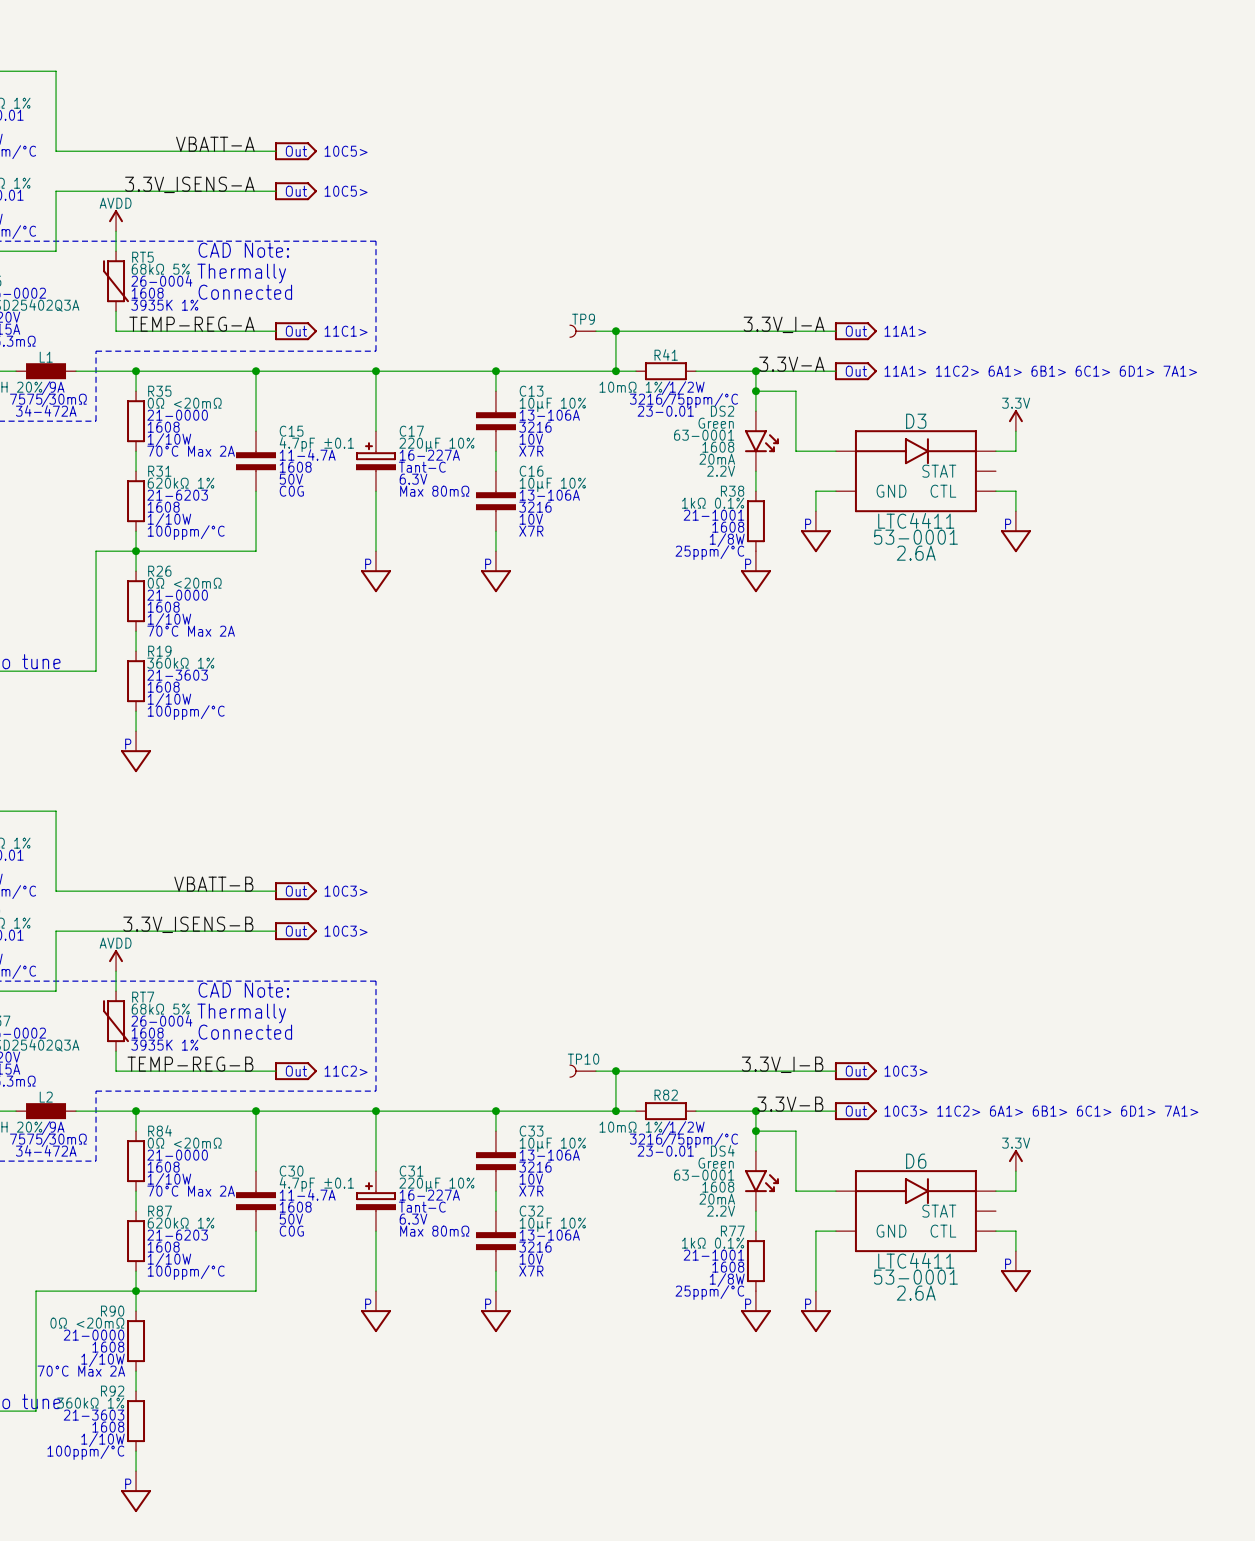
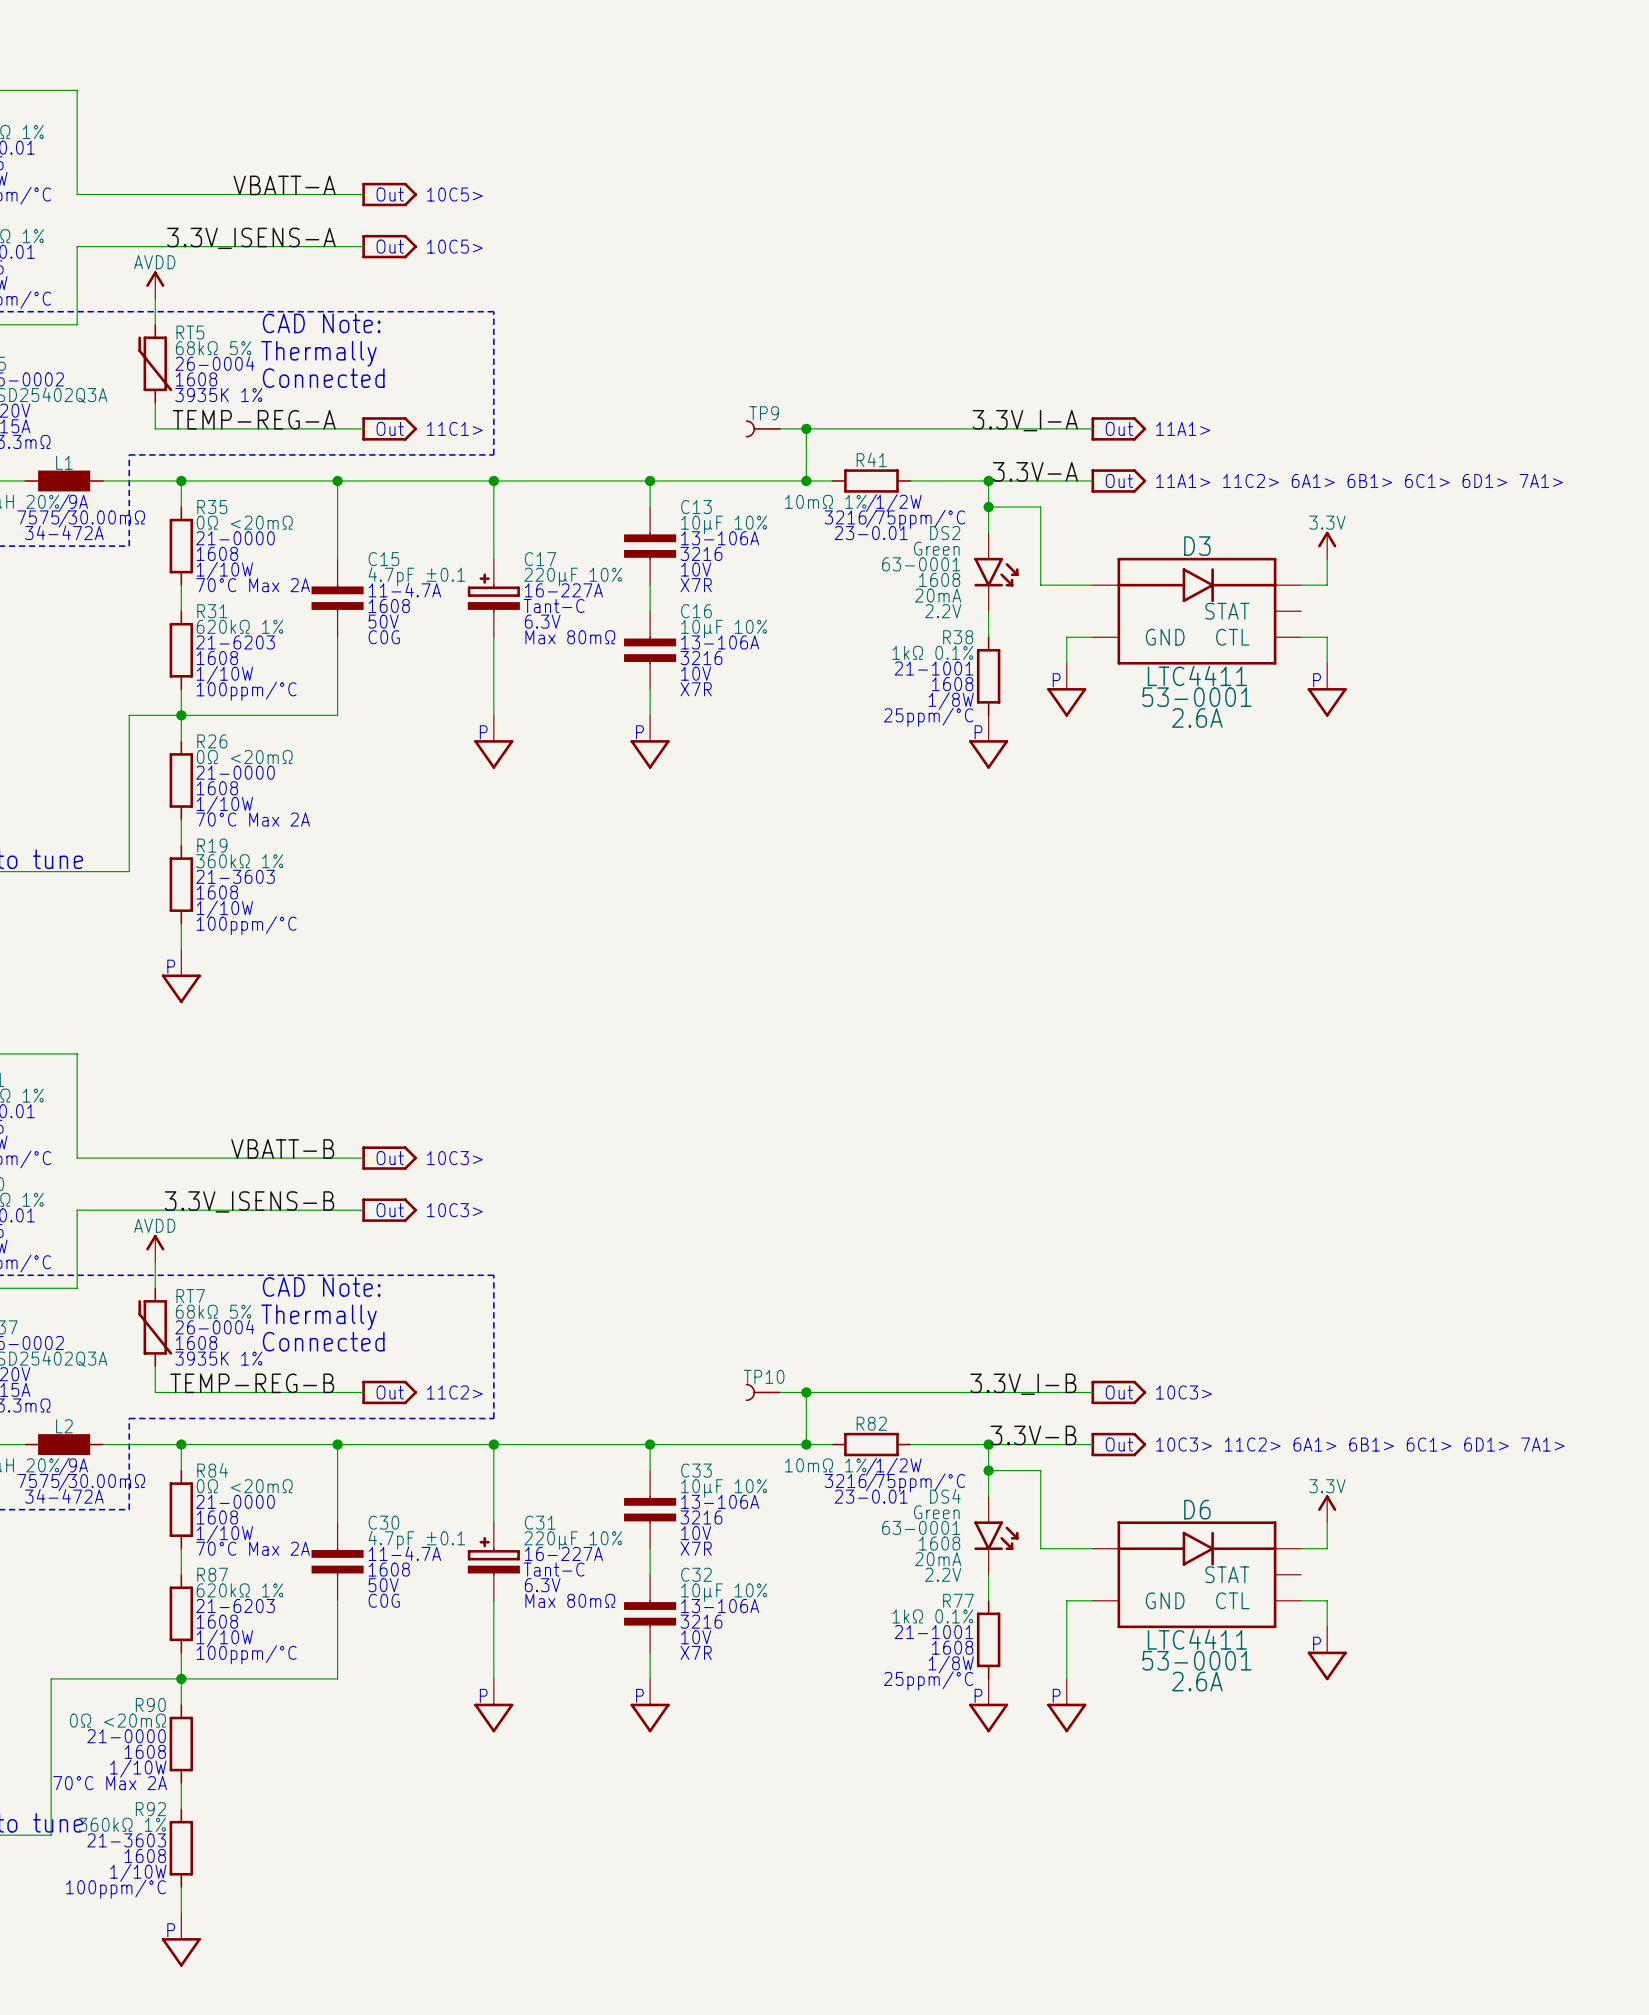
L1 text: 30mΩ (68, 399) -> 30.00mΩ (106, 517)
L2 text: 30mΩ (68, 1139) -> 30.00mΩ (106, 1481)

